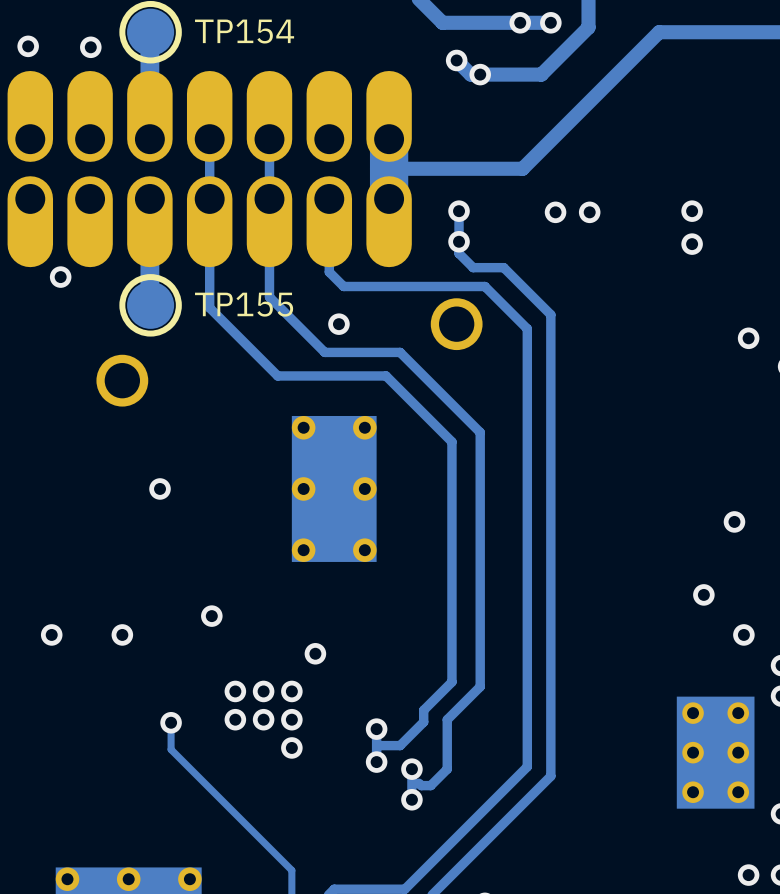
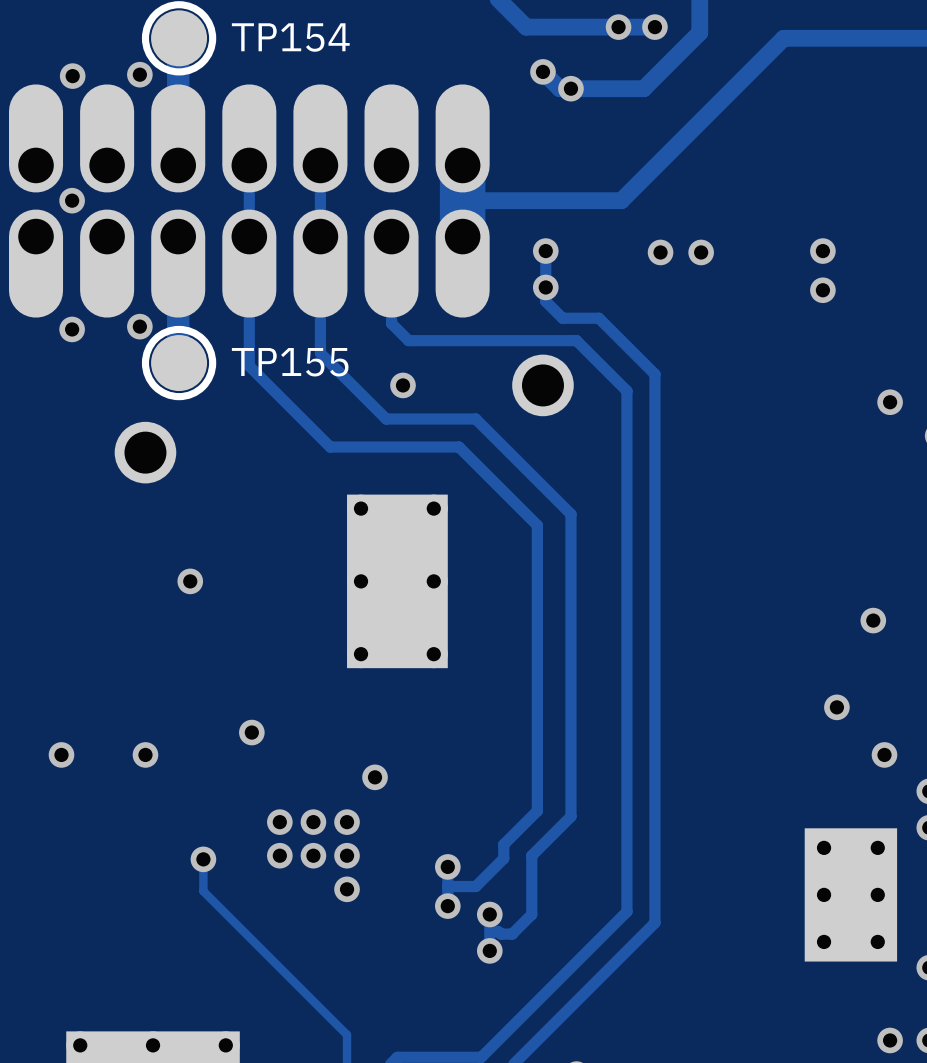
via: (28, 46) -> none
via: (90, 47) -> none
via: none -> (139, 74)
via: none -> (72, 76)
via: none -> (72, 200)
via: none -> (139, 326)

